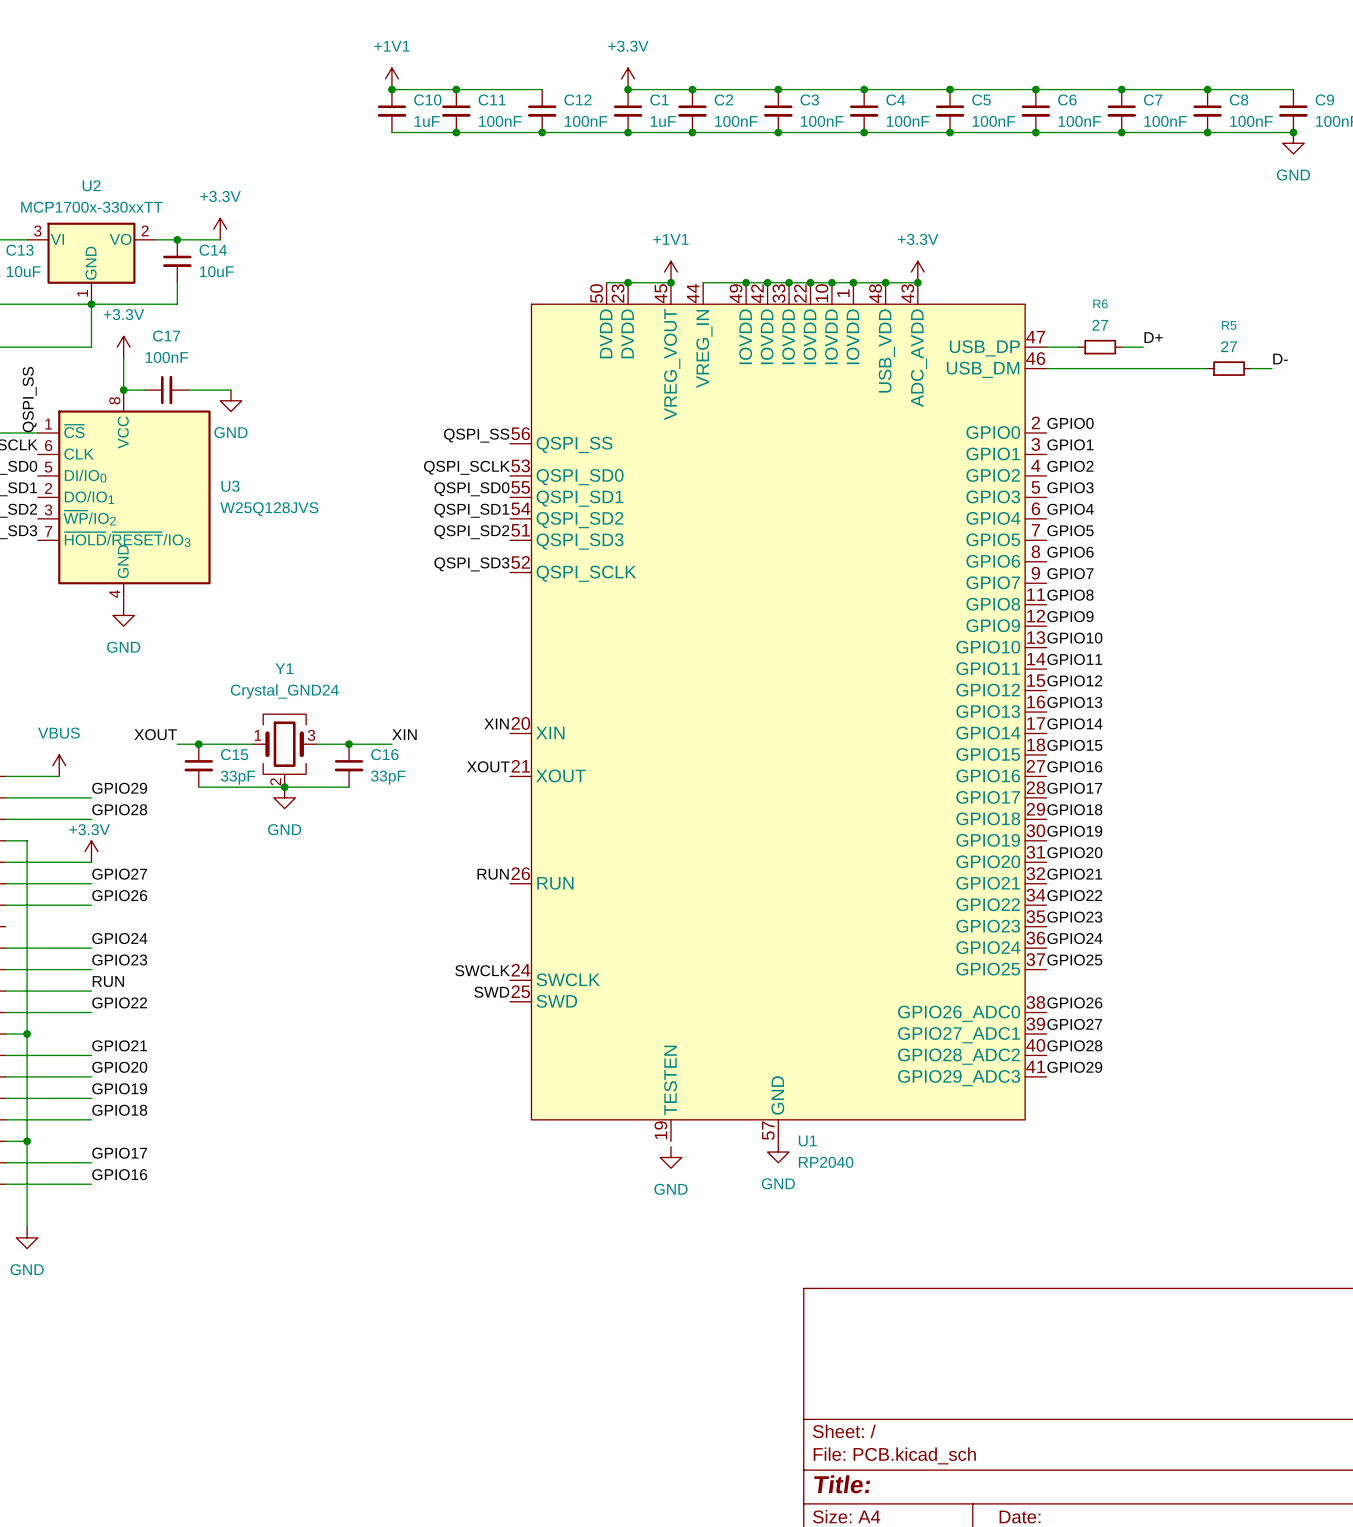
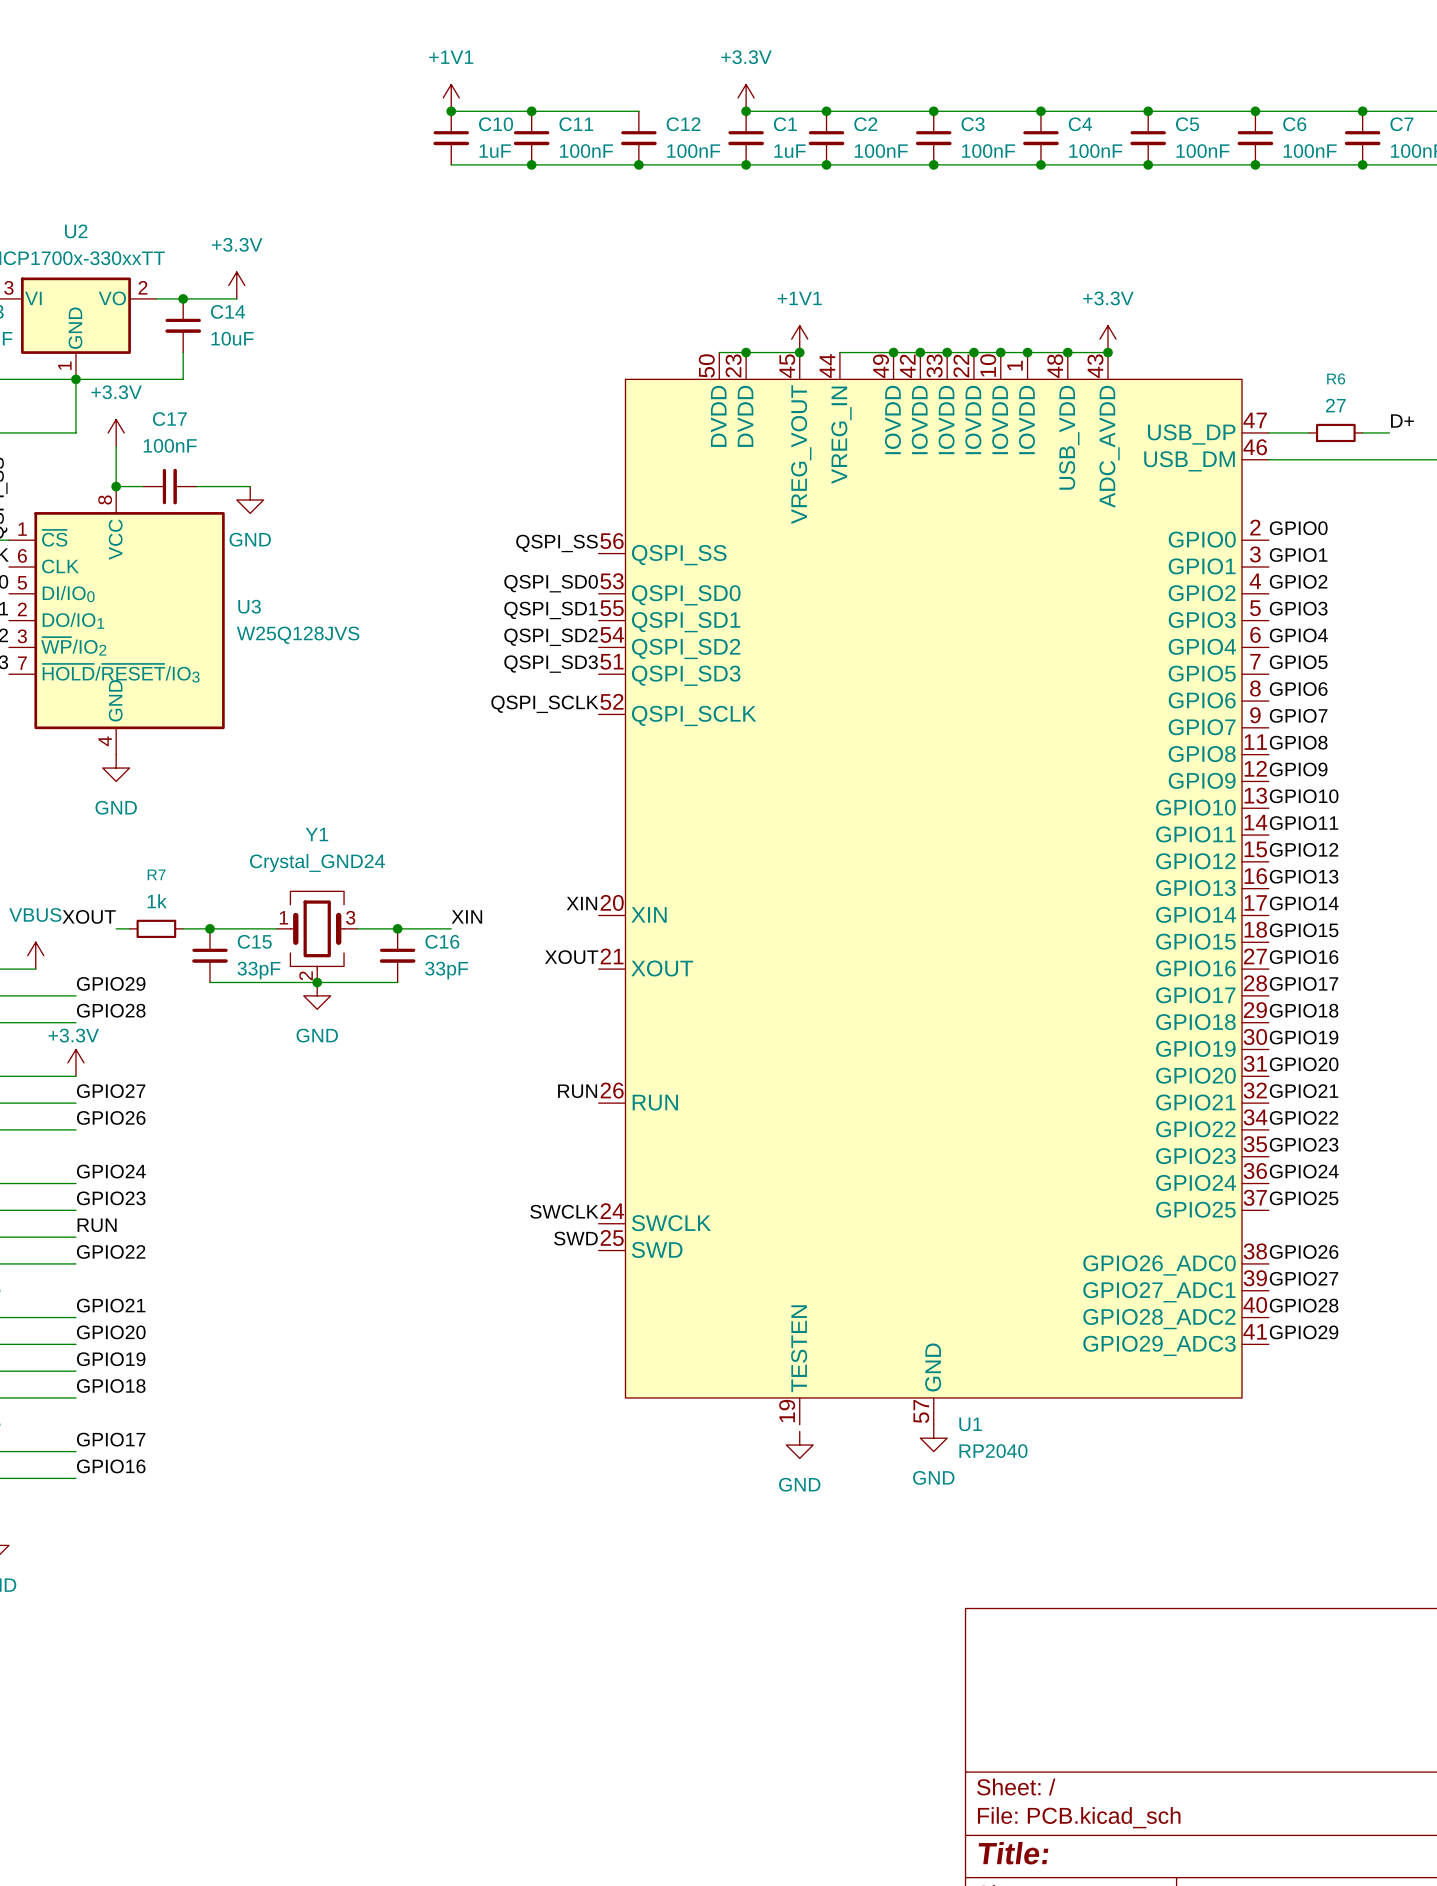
label: QSPI_SCLK (466, 467) -> QSPI_SD0 (551, 583)
label: QSPI_SD0 (471, 489) -> QSPI_SD1 (551, 610)
label: QSPI_SD1 (471, 510) -> QSPI_SD2 (551, 637)
label: QSPI_SD2 (471, 532) -> QSPI_SD3 (551, 664)
label: QSPI_SD3 (471, 564) -> QSPI_SCLK (544, 704)
label position: XOUT (155, 734) -> XOUT (89, 916)
wire: none -> (116, 928) (129, 928)
R7: none -> 1k (156, 928)

